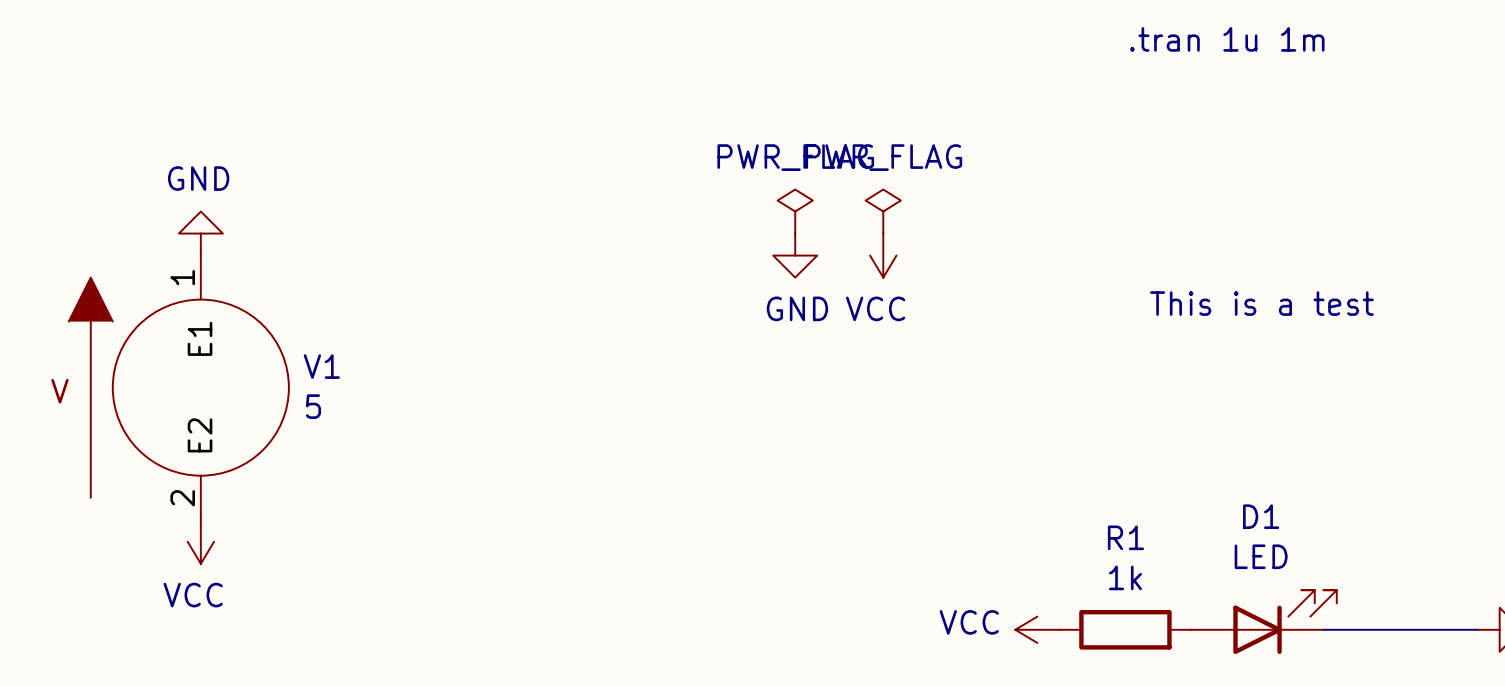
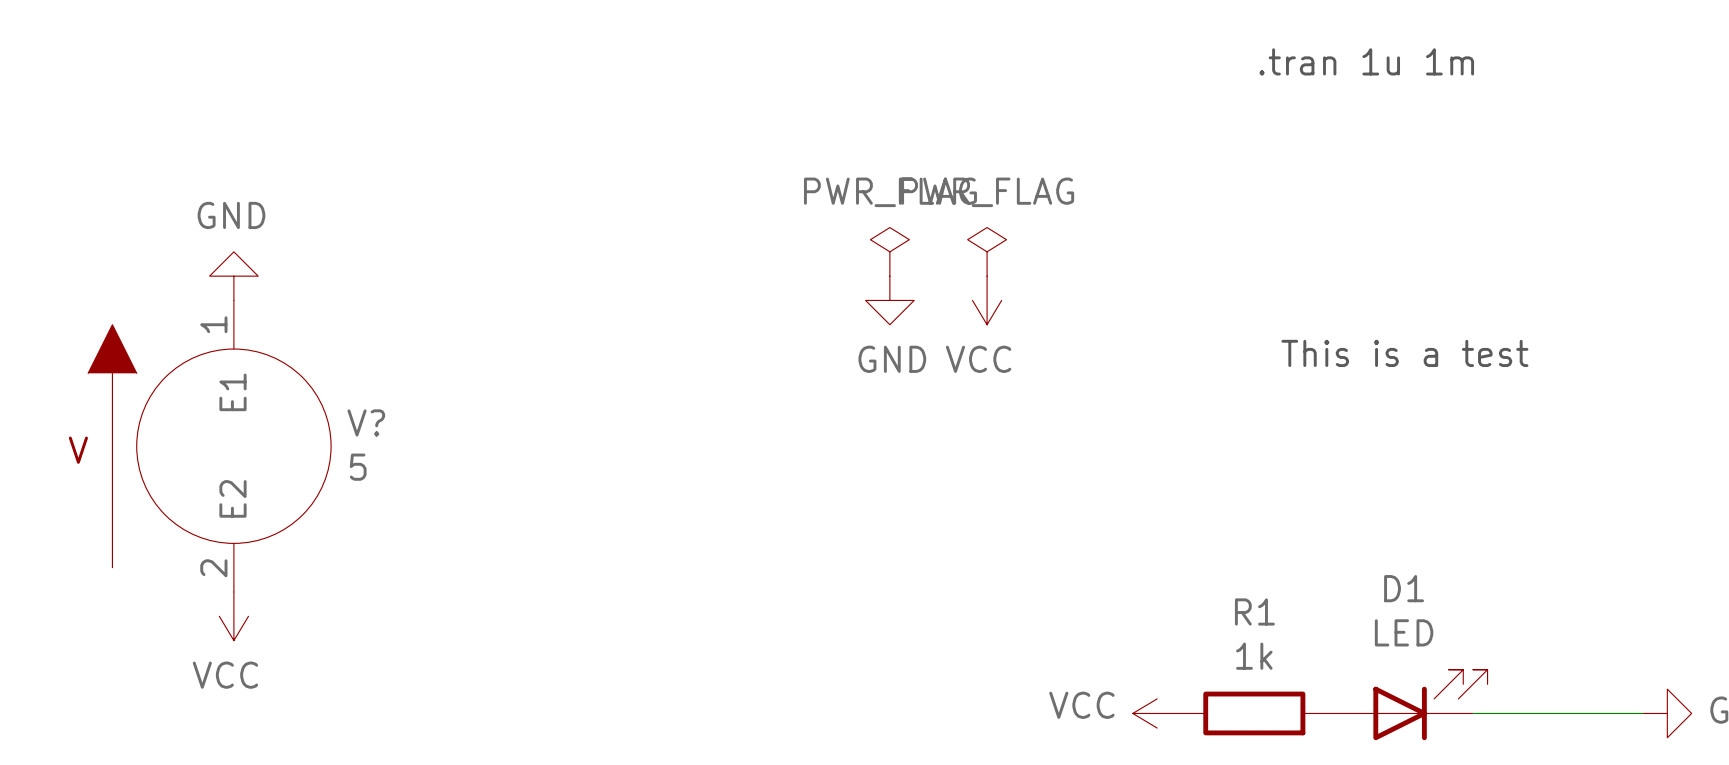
V1 name: V1 (321, 366) -> V? (366, 422)

